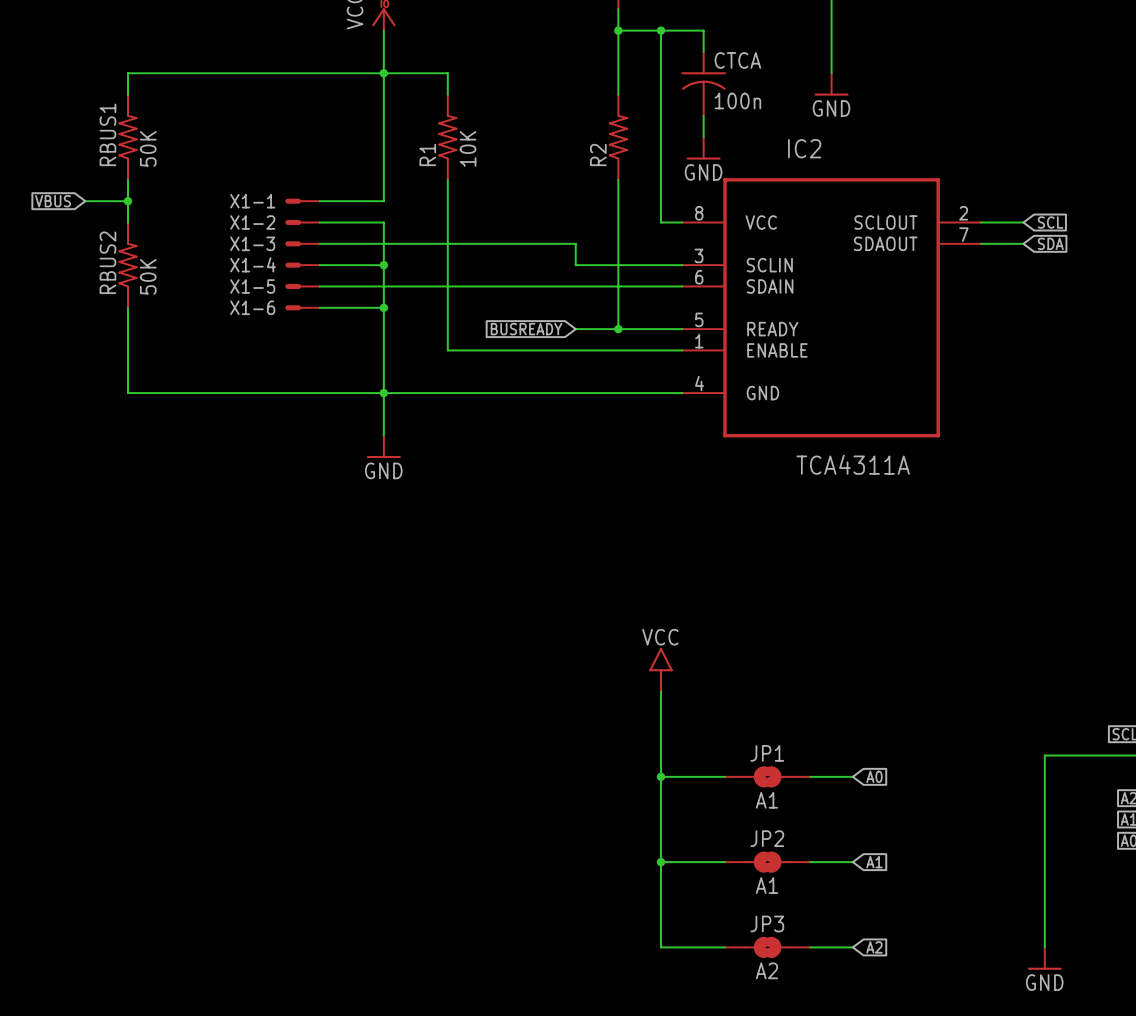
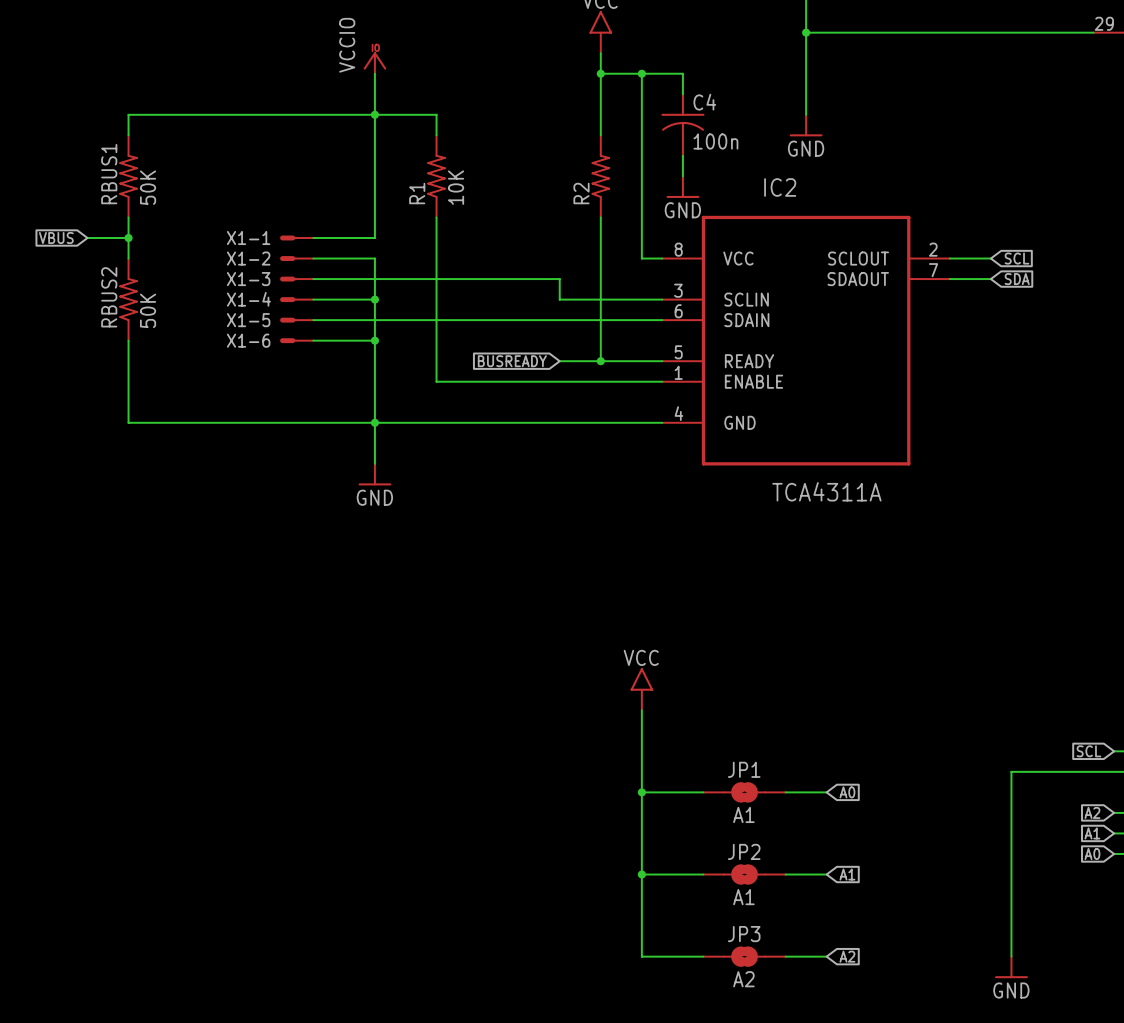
CTCA name: CTCA (737, 60) -> C4 (704, 102)

